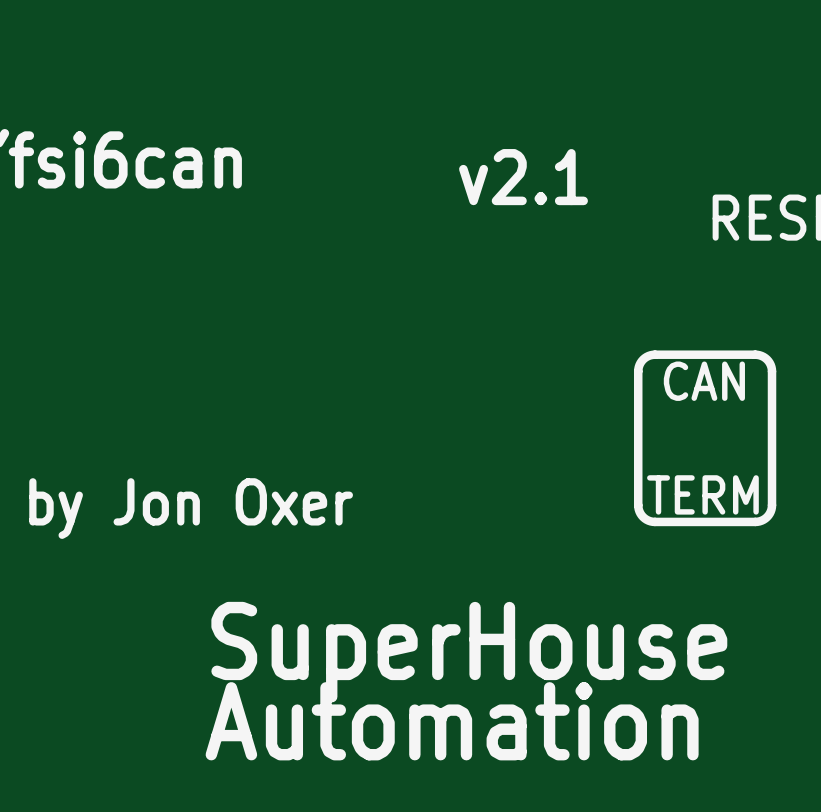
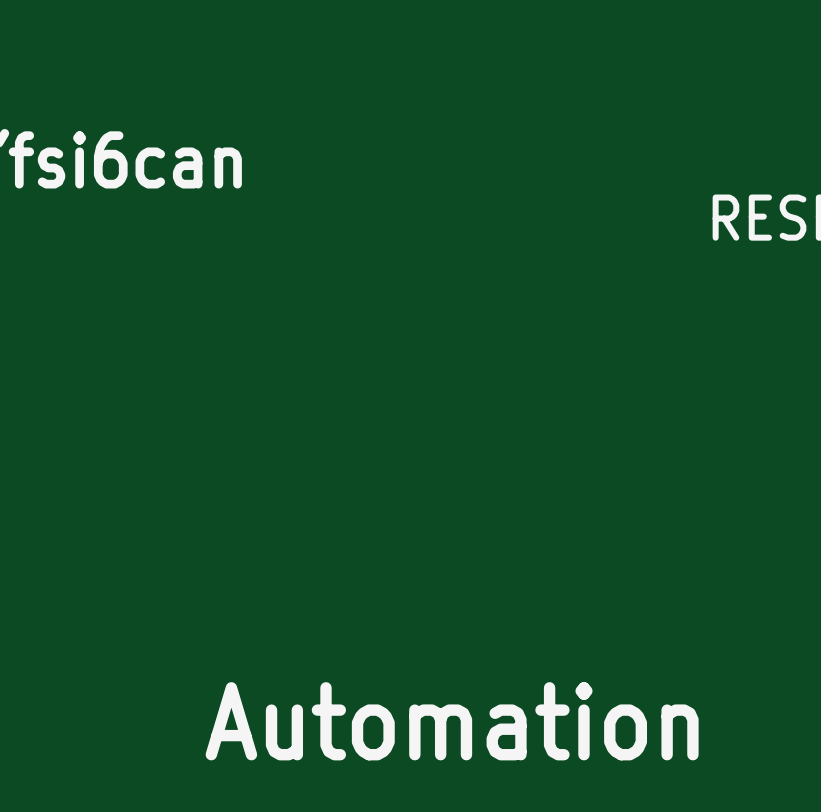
text: v2.1 (523, 177) -> none
line: (654, 354) (757, 354) (765, 358) (769, 363) (772, 371) (772, 505) (769, 513) (763, 519) (755, 521) (654, 521) (646, 519) (640, 513) (638, 505) (638, 369) (643, 359) (654, 354) -> none
text: CAN (704, 381) -> none
text: TERM (702, 494) -> none
text: by Jon Oxer (191, 508) -> none
text: SuperHouse (469, 652) -> none

